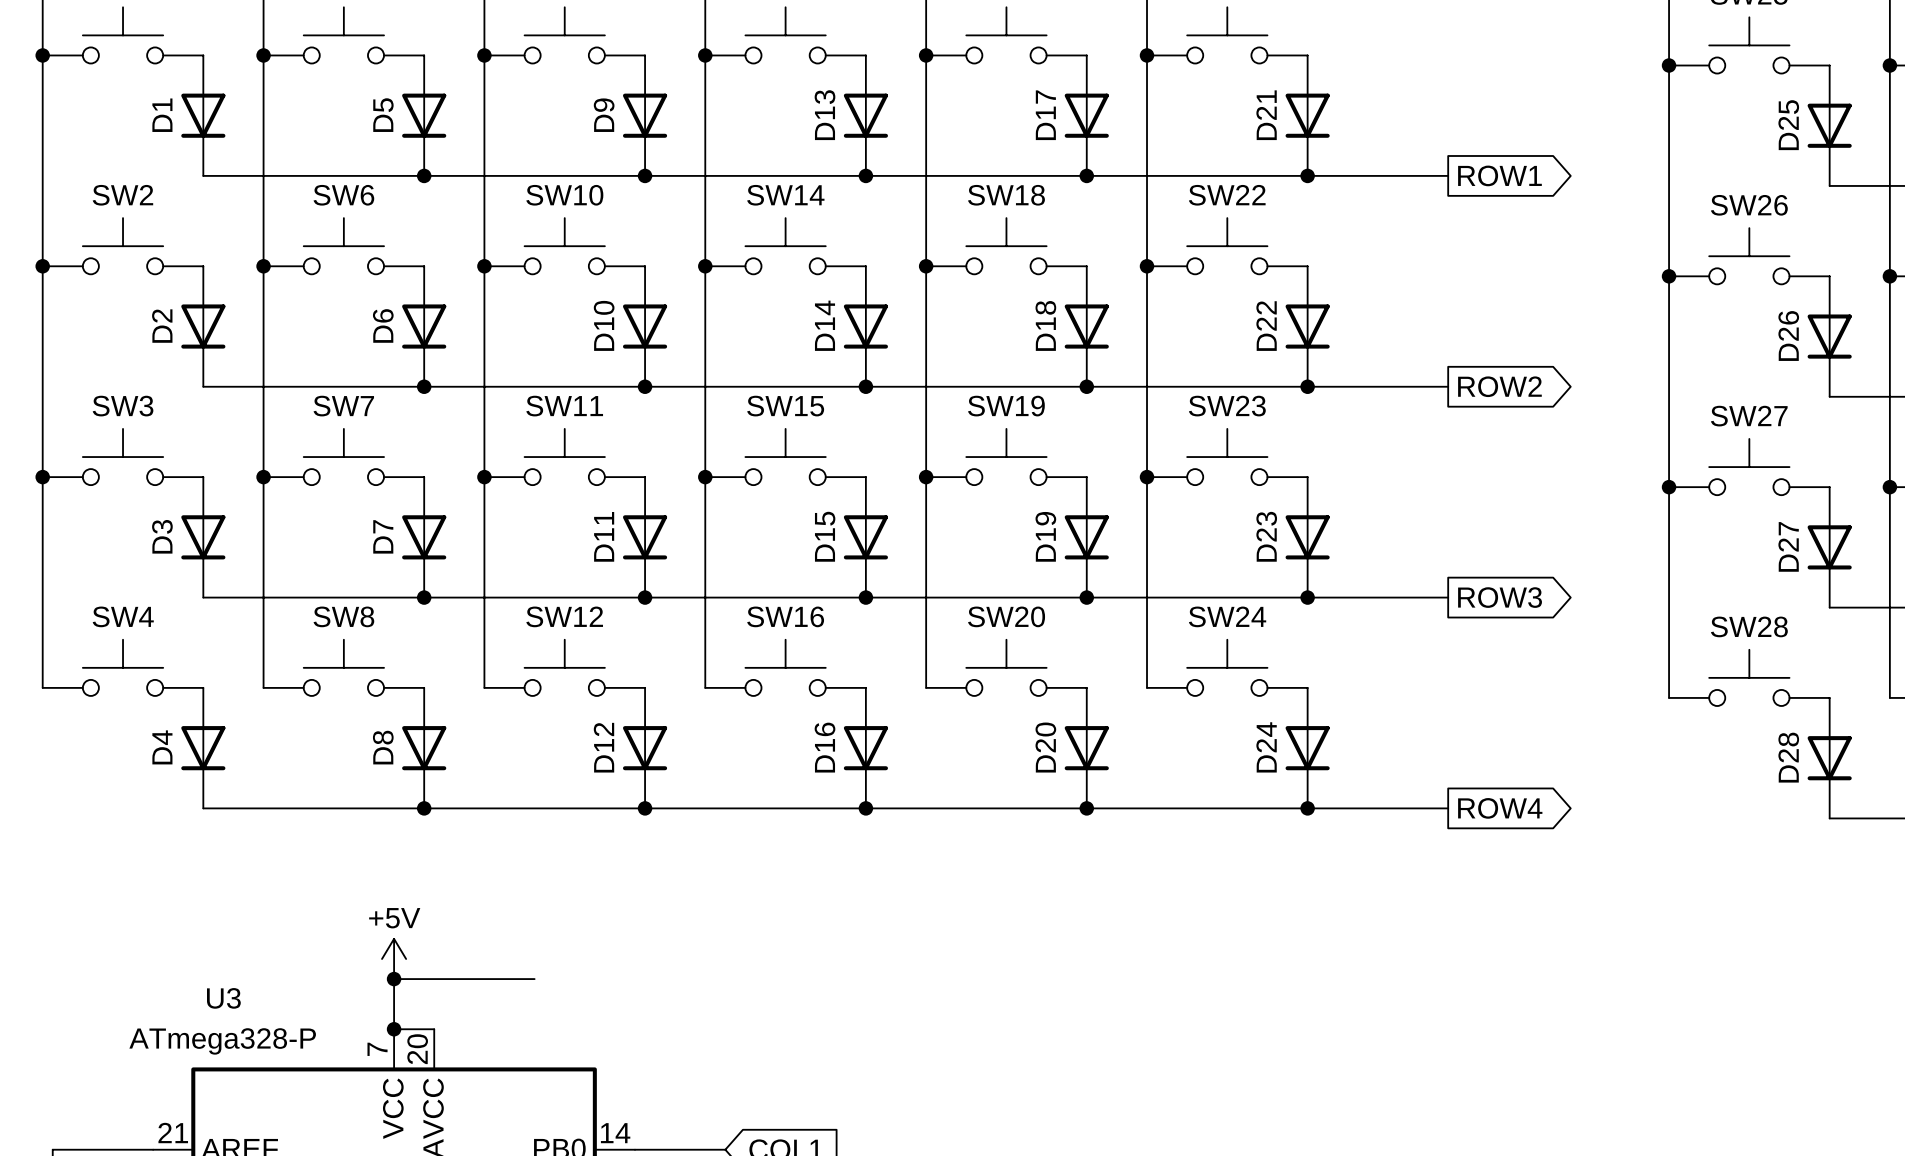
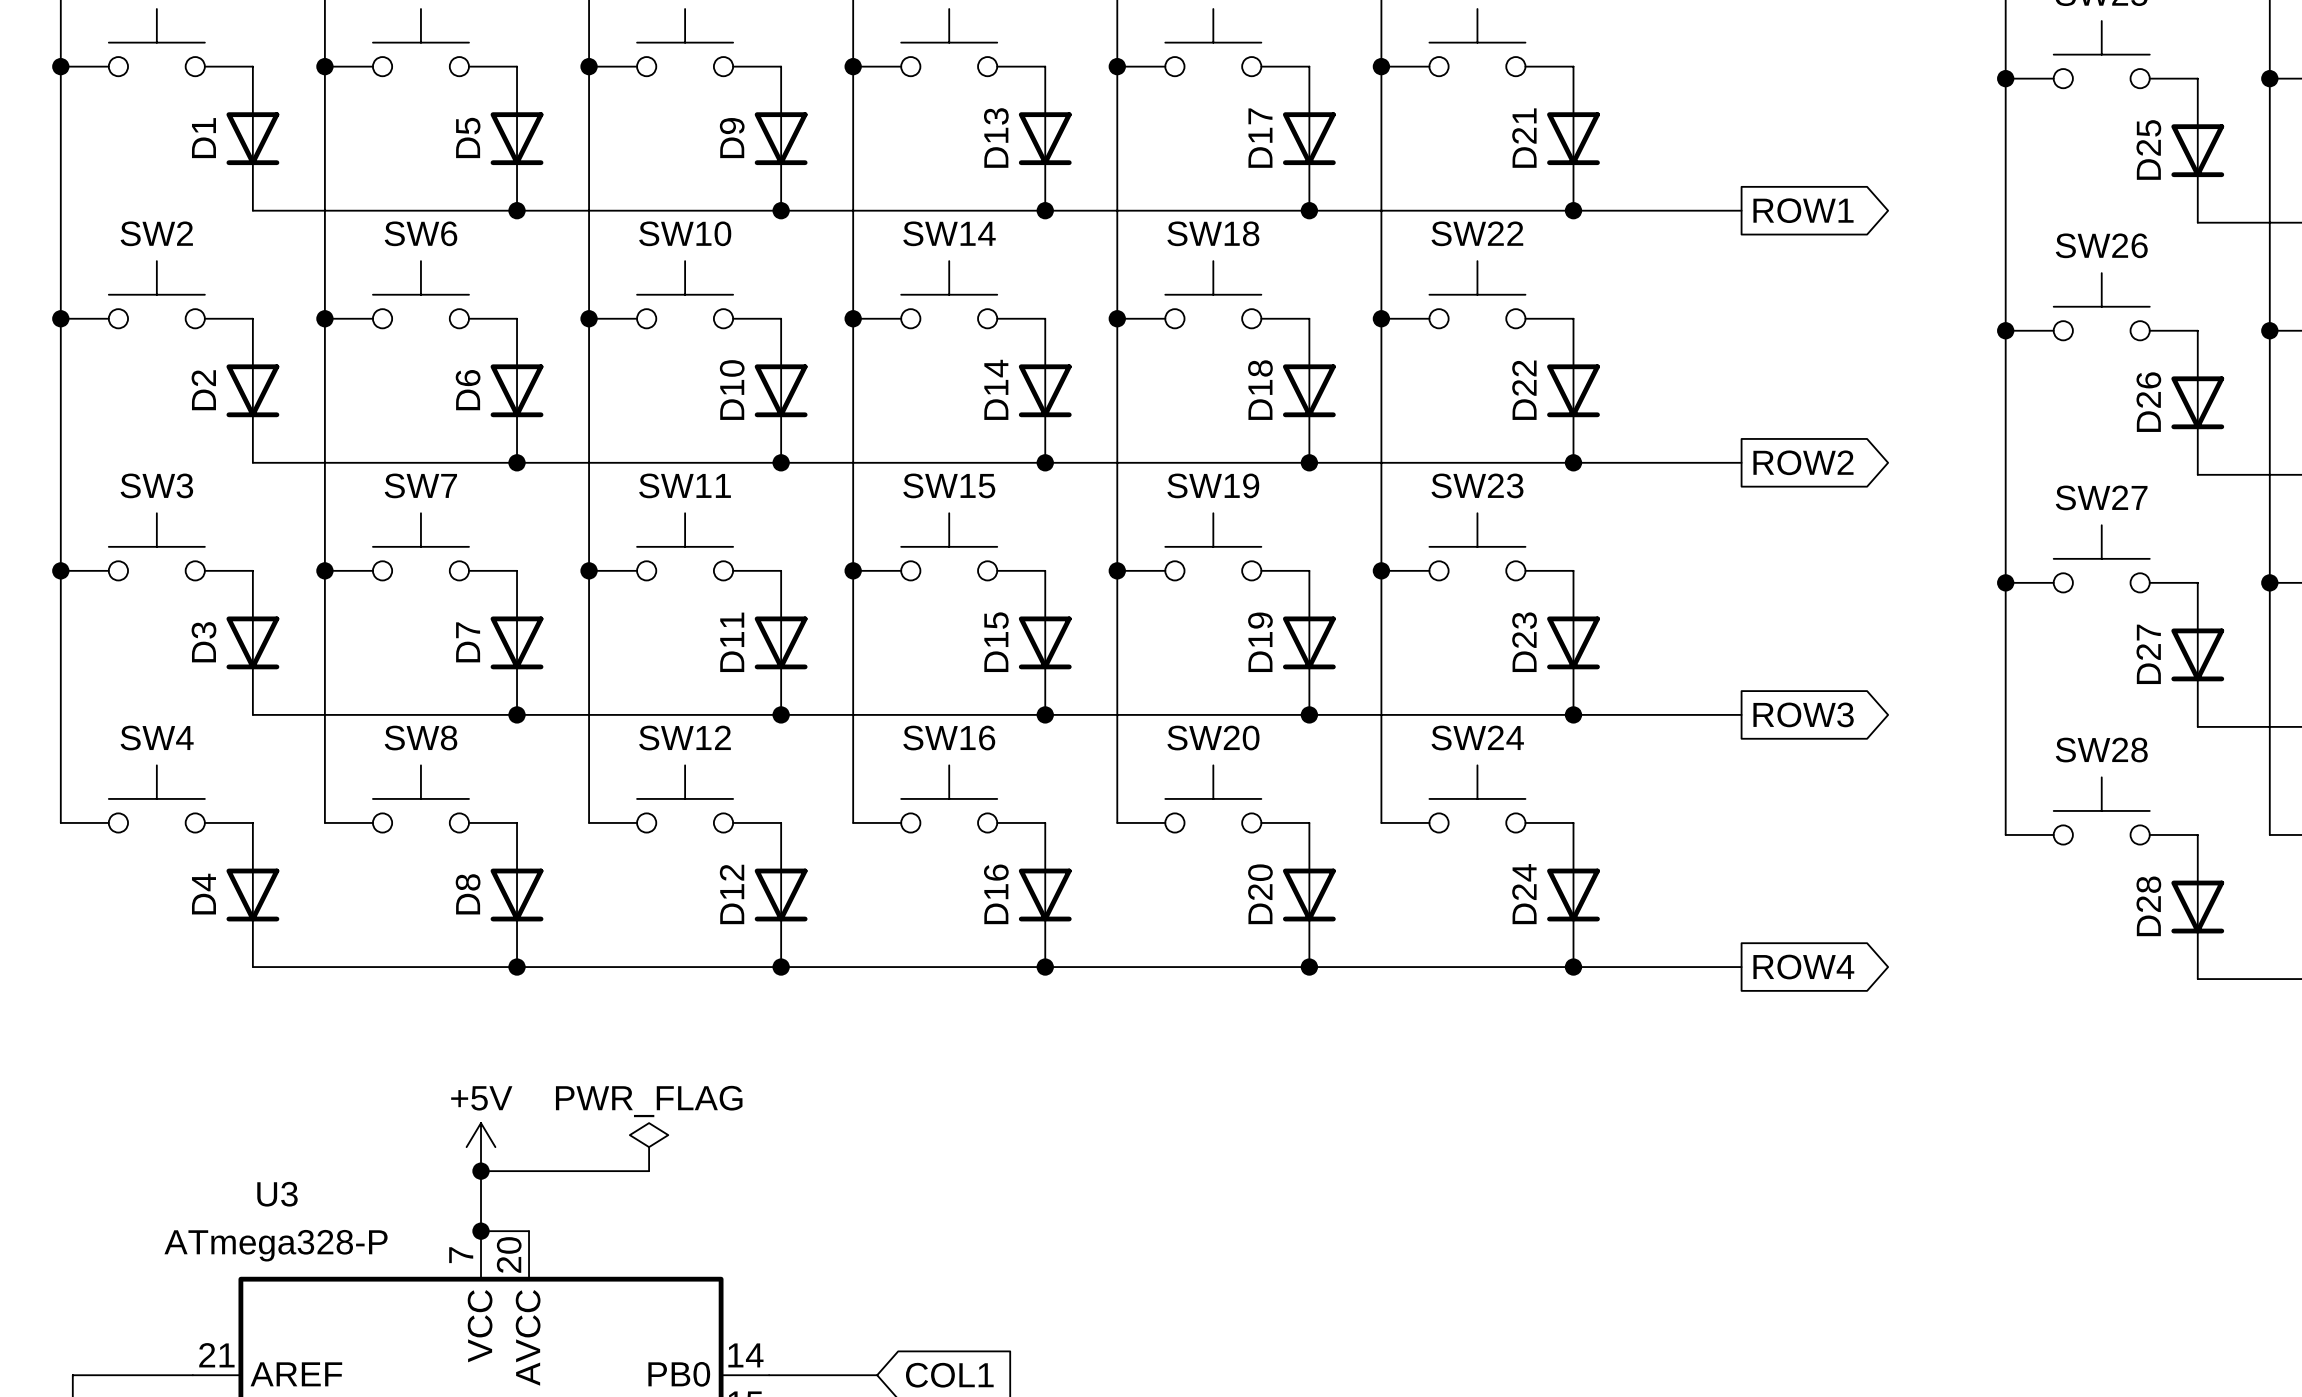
power symbol: none -> PWR_FLAG (649, 1147)

